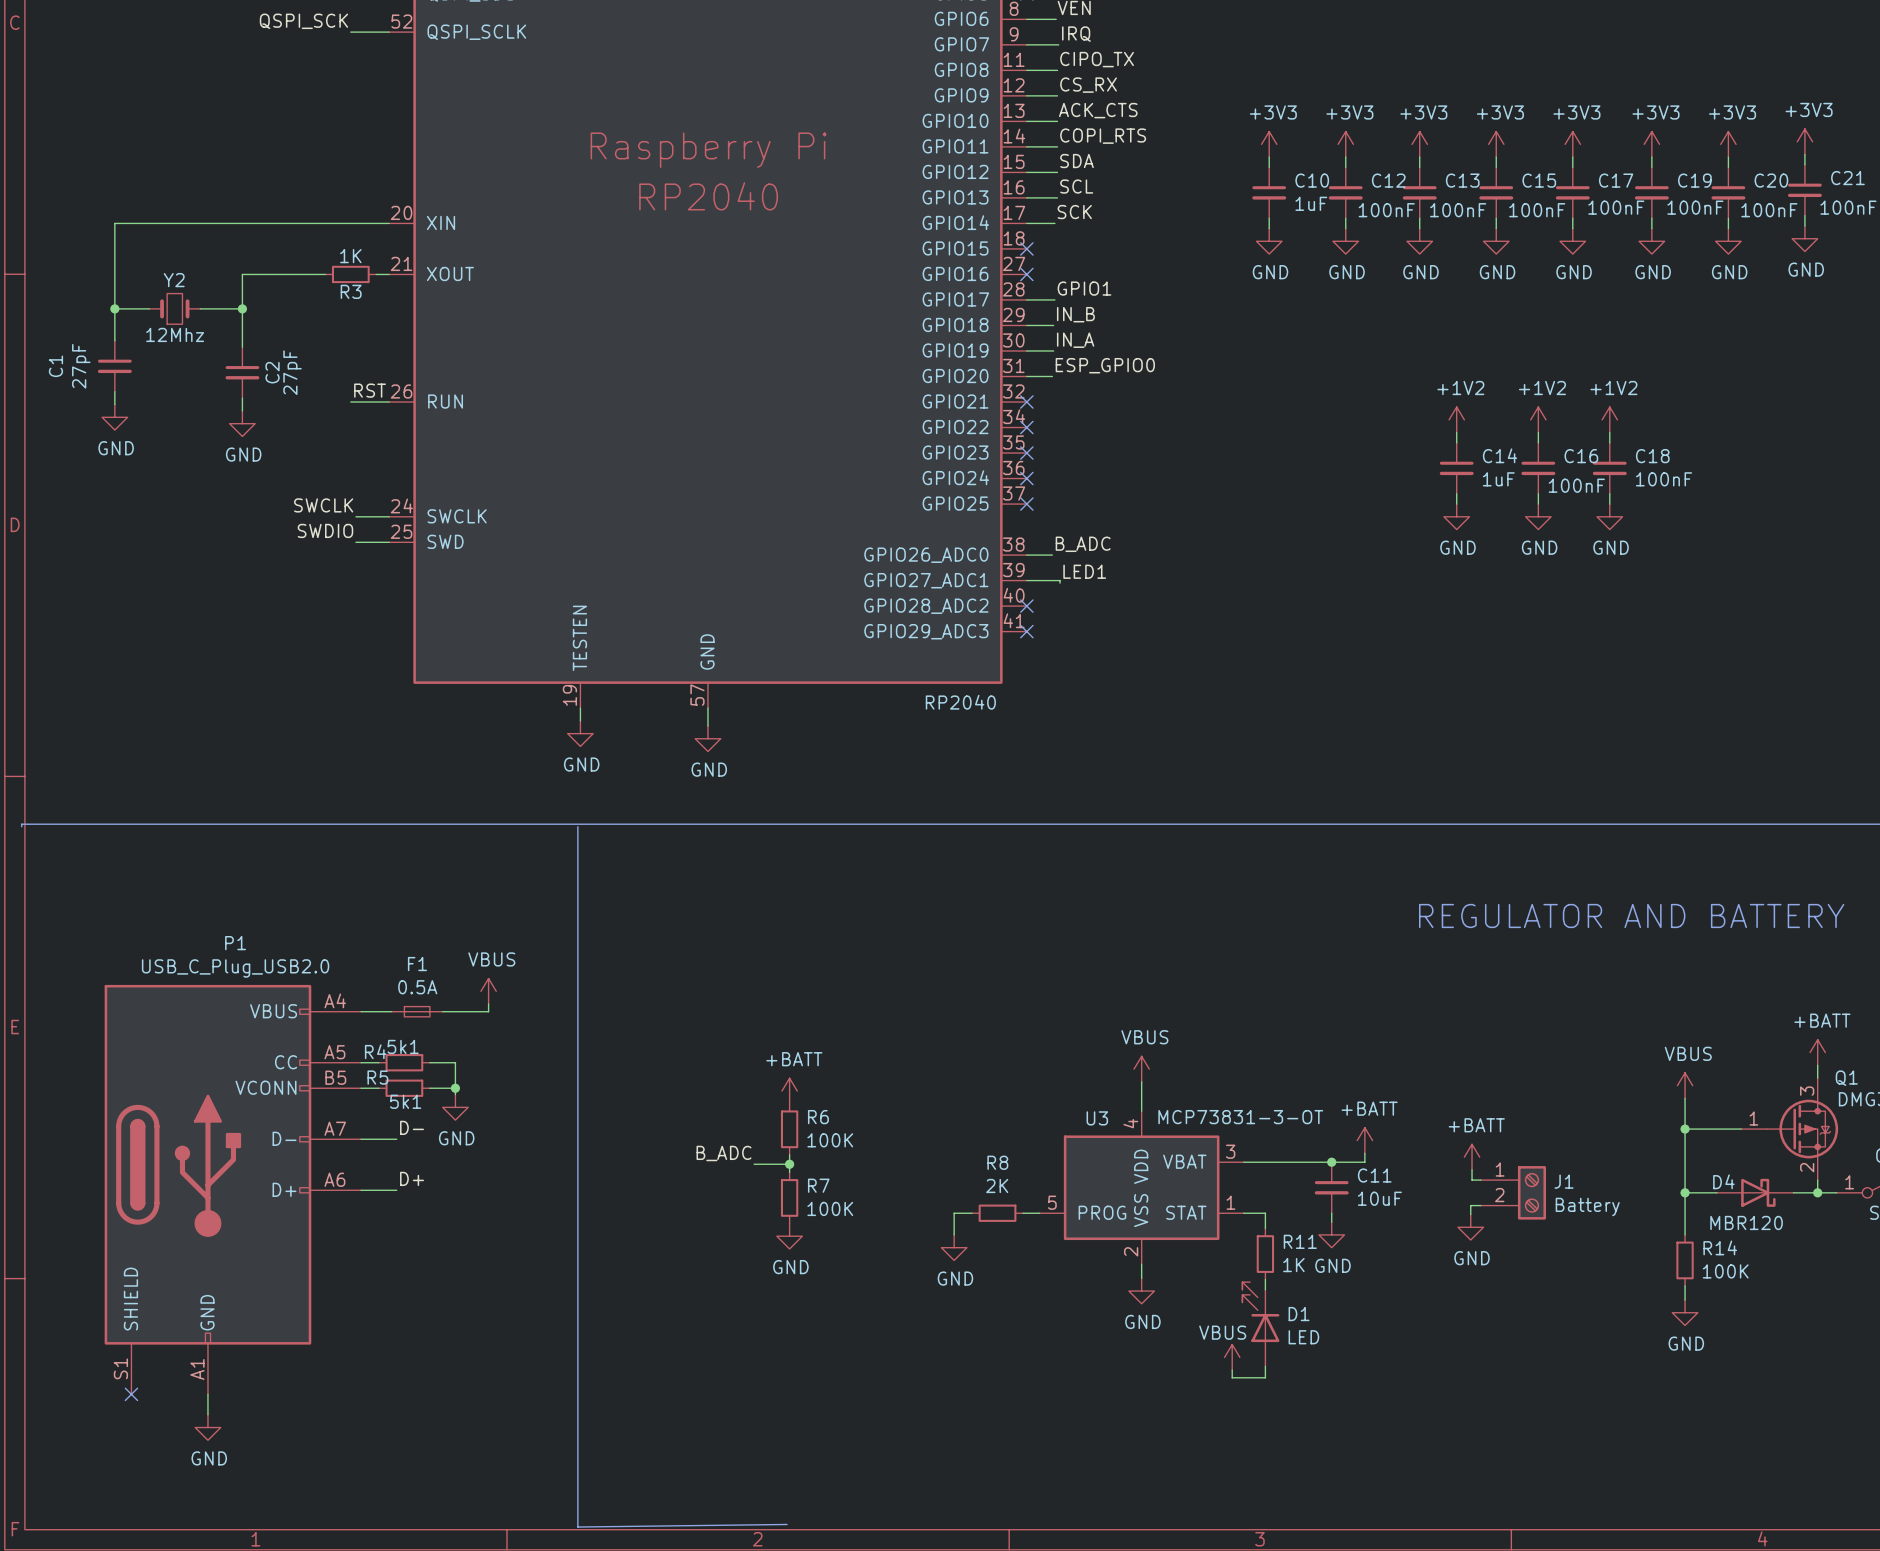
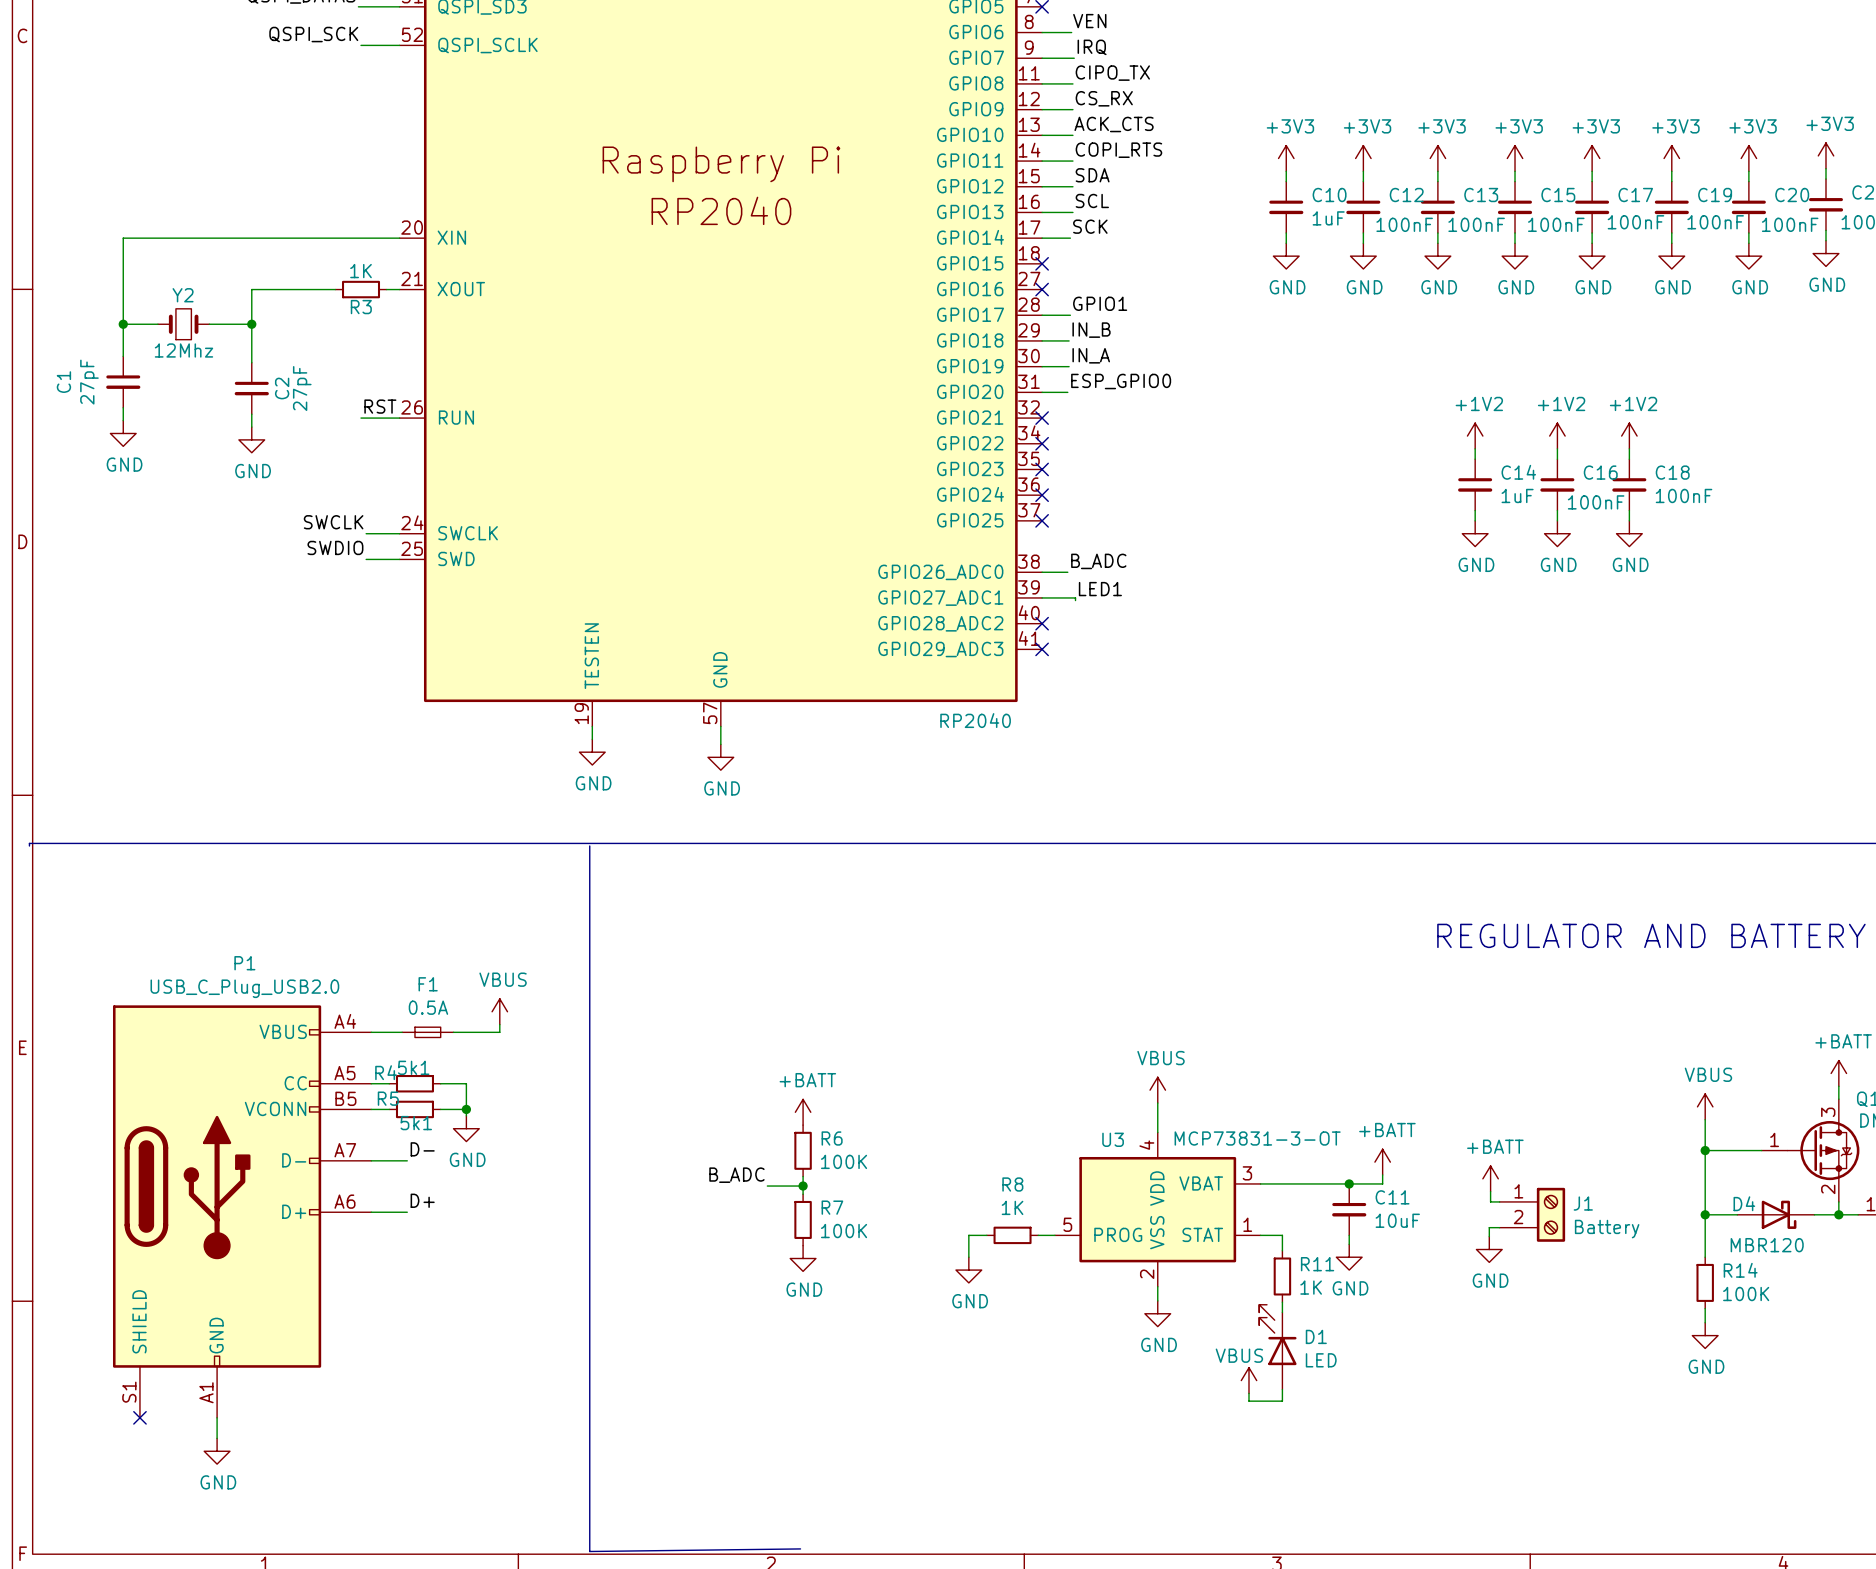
R8 value: 2K (997, 1185) -> 1K (1012, 1207)

